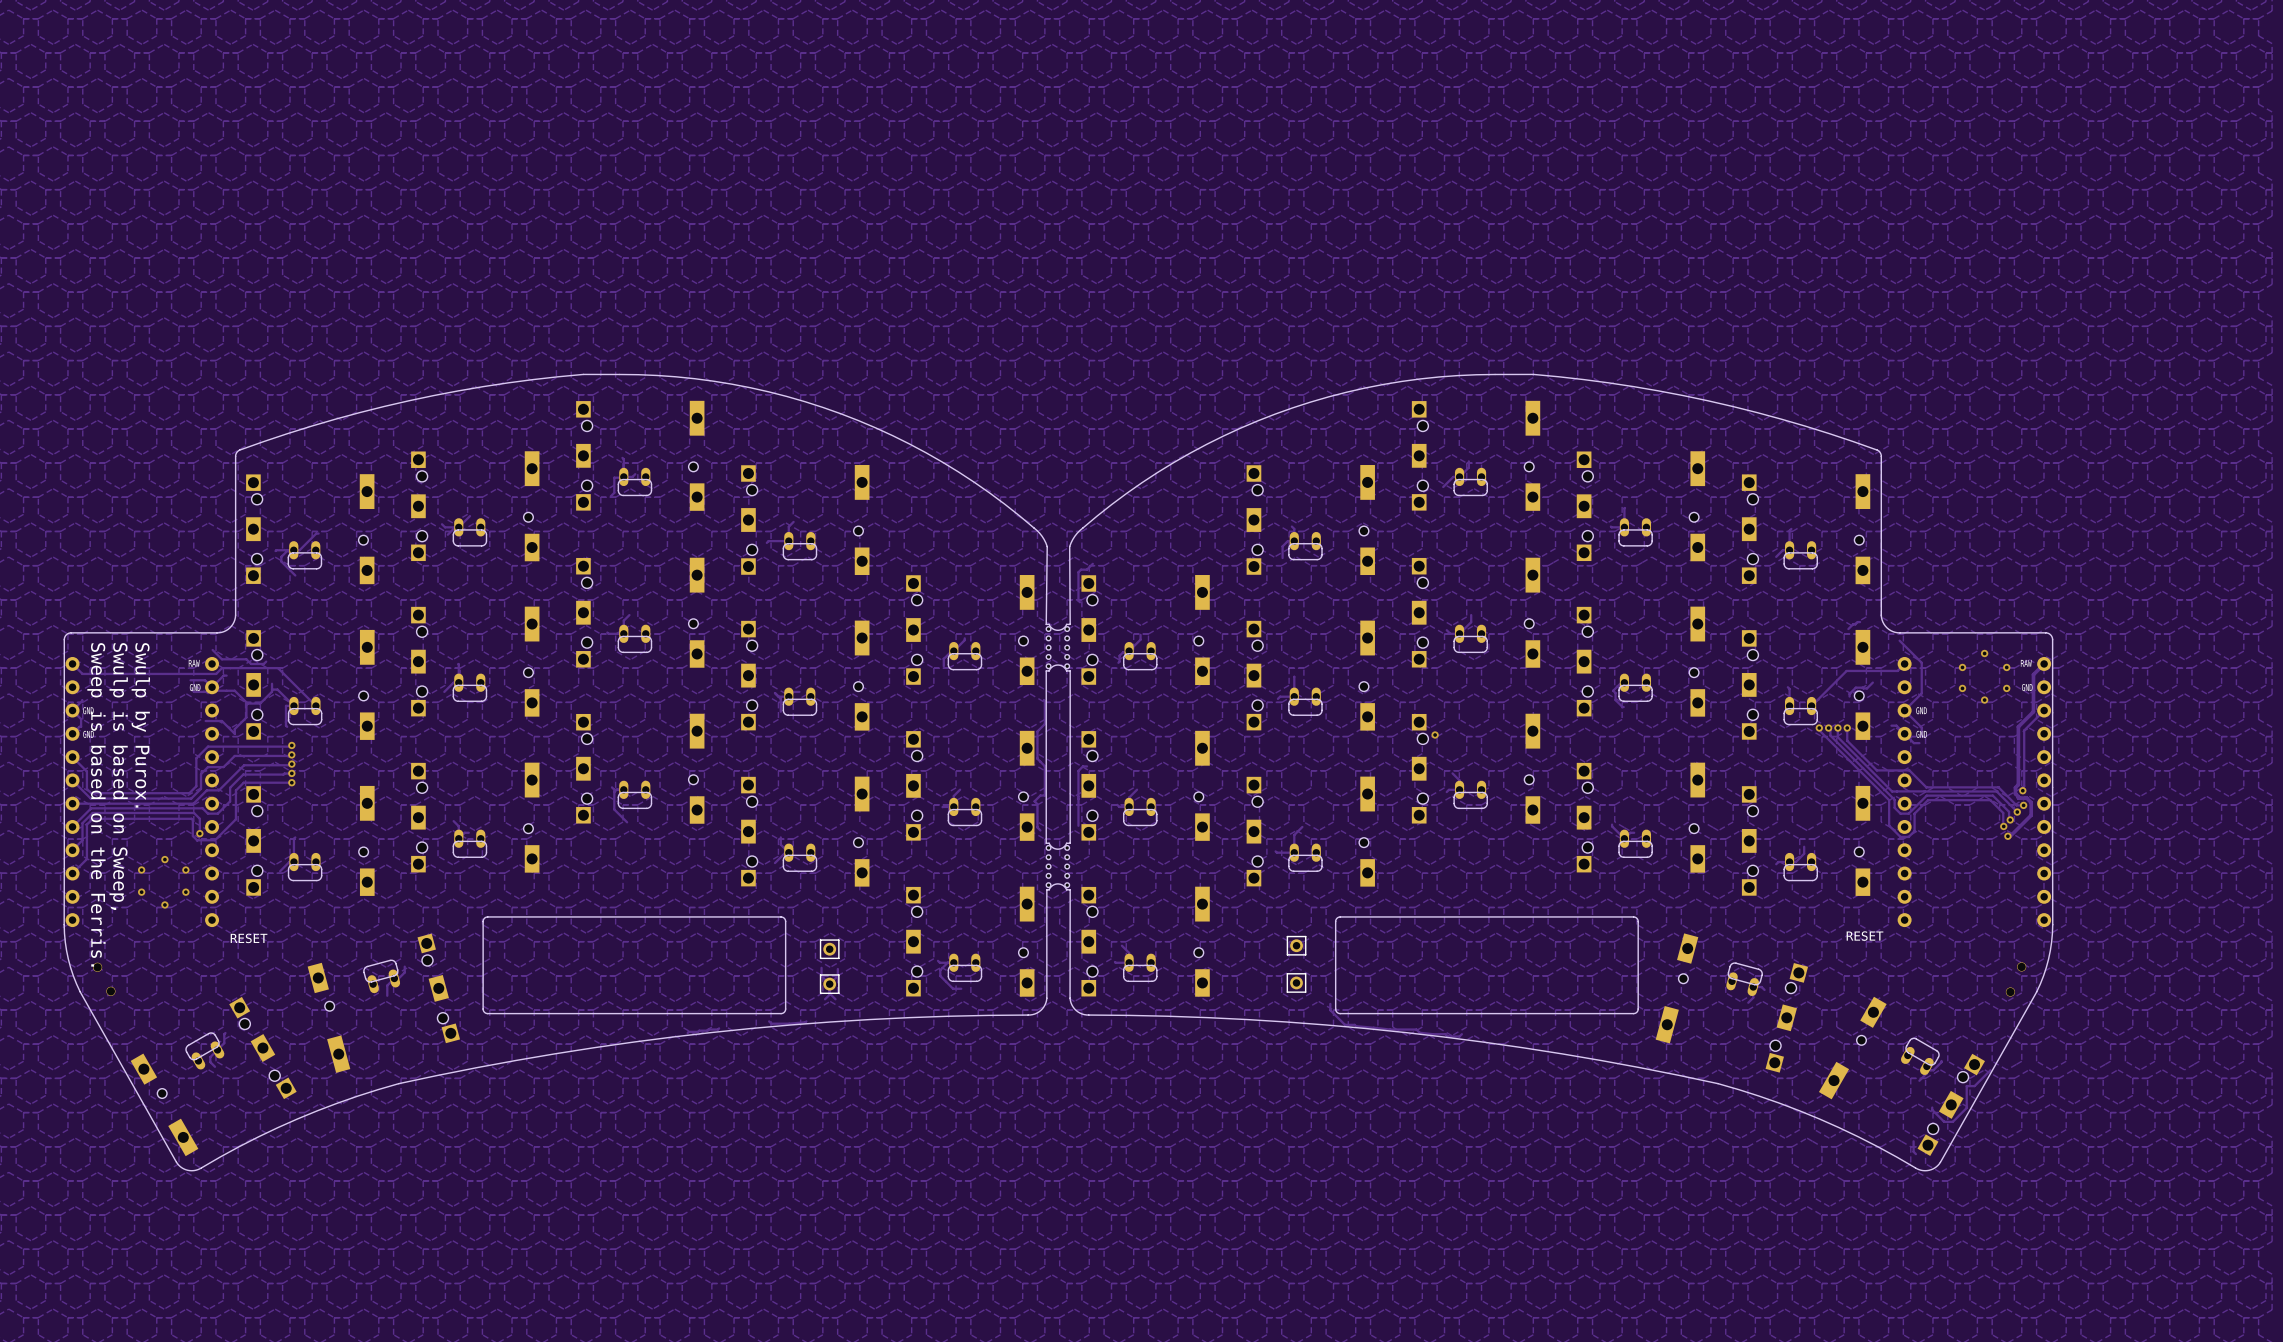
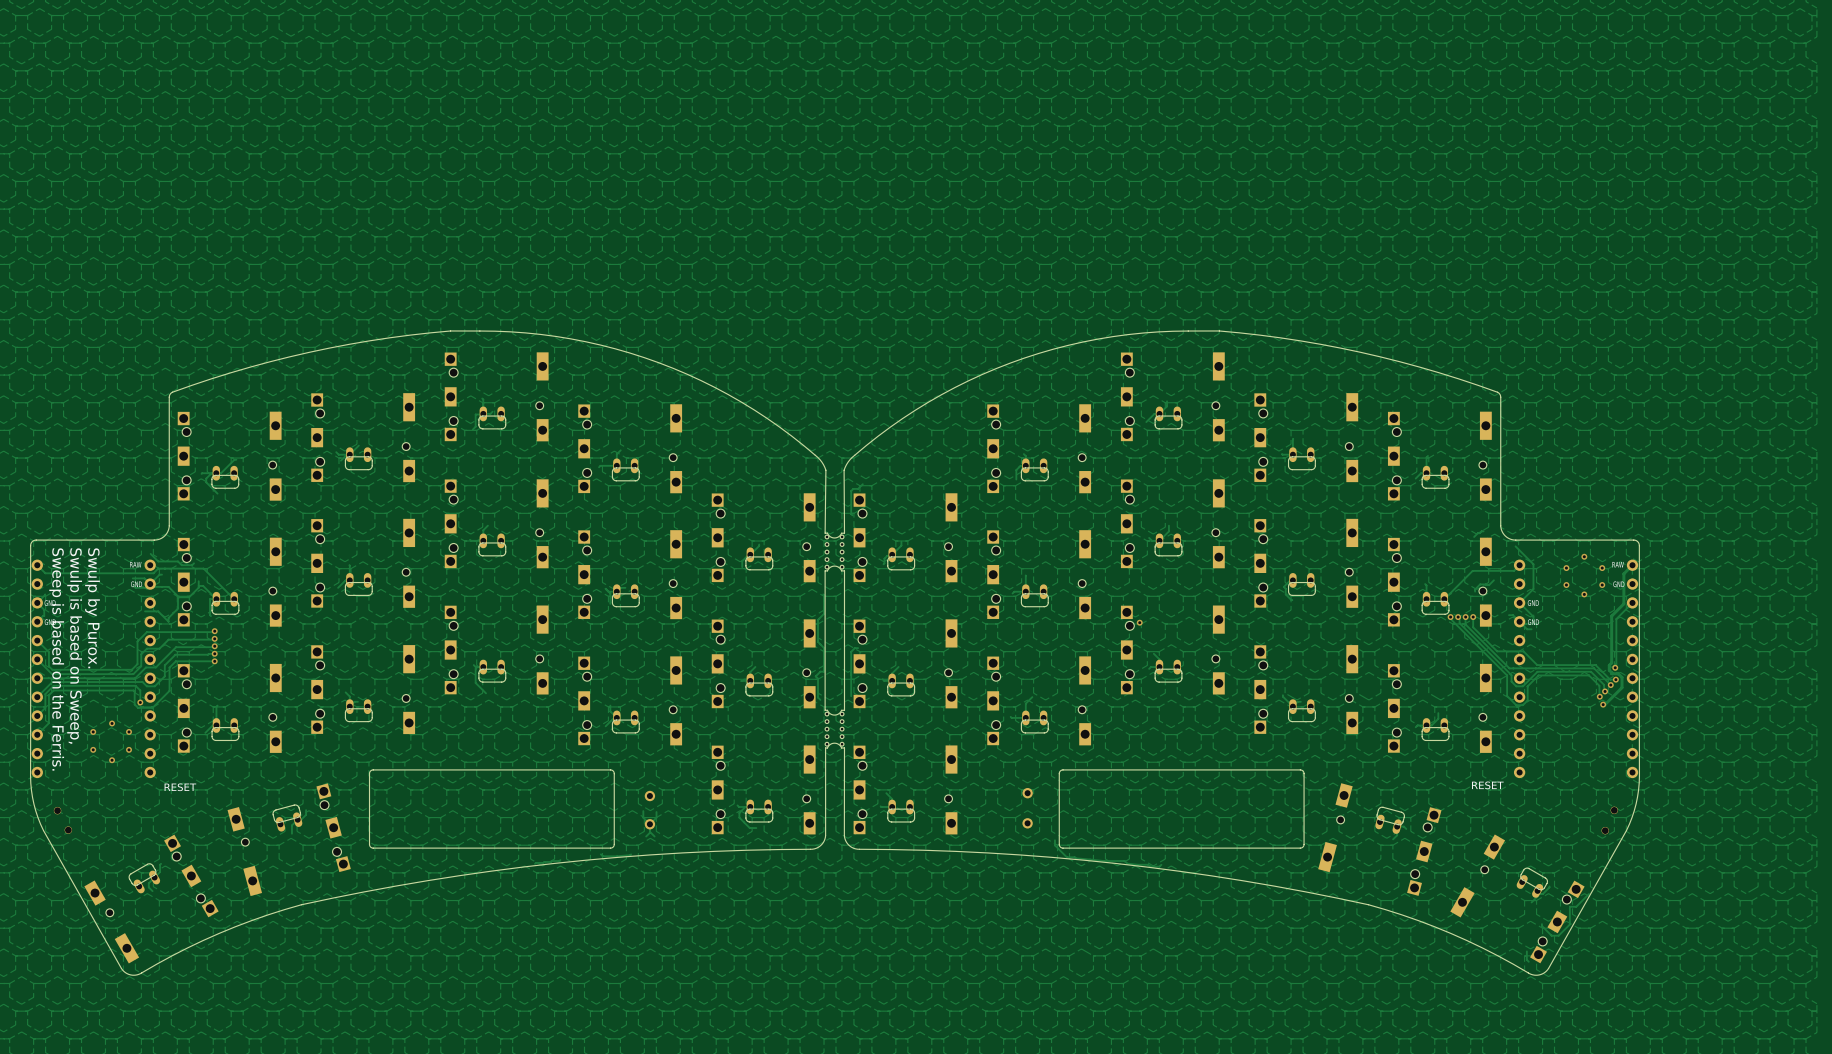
part footprint: [1286, 935, 1307, 956] -> [1022, 788, 1033, 799]
part footprint: [819, 939, 840, 960] -> [644, 790, 656, 802]
part footprint: [1286, 973, 1307, 993] -> [1022, 818, 1033, 829]
part footprint: [819, 974, 840, 994] -> [644, 819, 656, 830]

